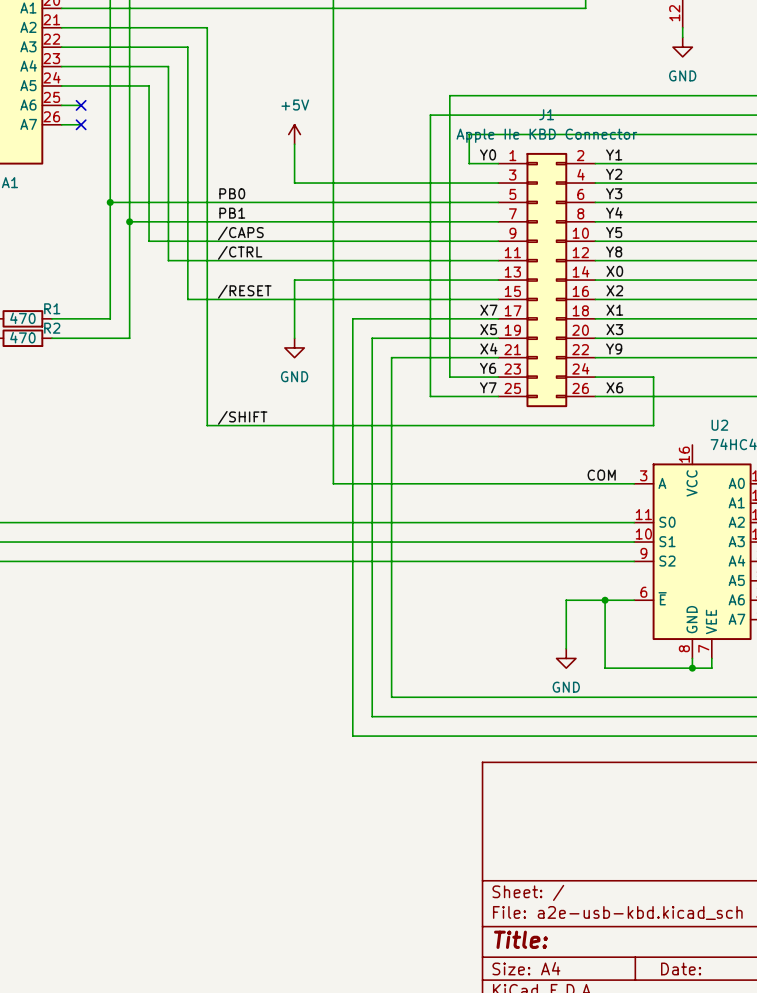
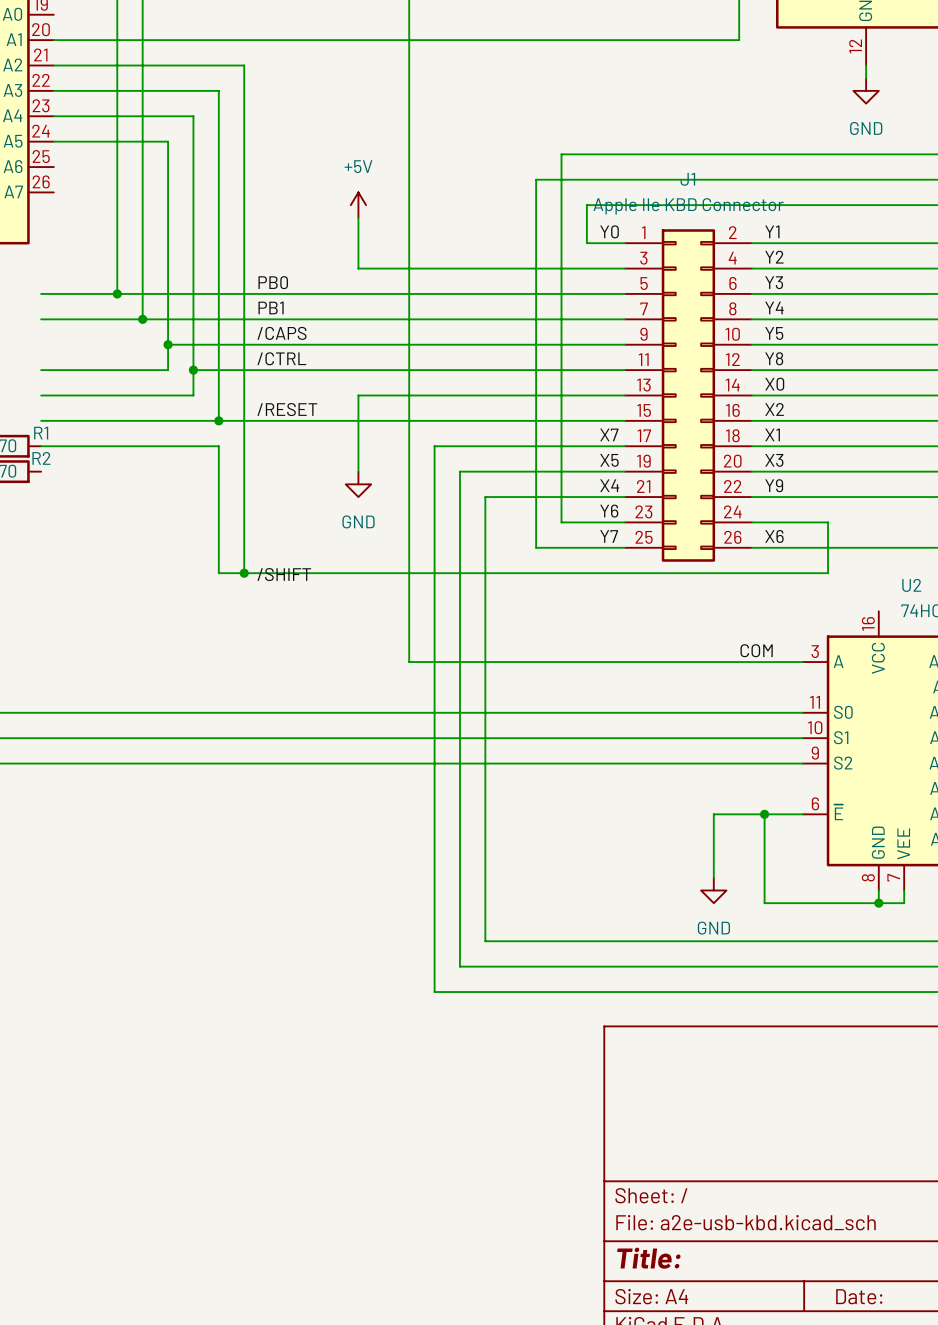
wire: (61, 105) (81, 105) -> none
no-connect mark: (81, 105) -> none
wire: (61, 124) (81, 124) -> none
no-connect mark: (81, 124) -> none
wire: (110, 202) (110, 318) -> (117, 293) (41, 293)
wire: (129, 221) (129, 338) (52, 338) -> (142, 319) (41, 319)
wire: none -> (168, 344) (168, 370) (41, 370)
junction: none -> (168, 344)
wire: none -> (193, 370) (193, 395) (41, 395)
junction: none -> (193, 370)
wire: none -> (41, 420) (218, 420)
junction: none -> (218, 420)
wire: (207, 415) (207, 425) (653, 425) (653, 415) -> (117, 446) (218, 446) (218, 573) (828, 573)
junction: none -> (244, 573)

